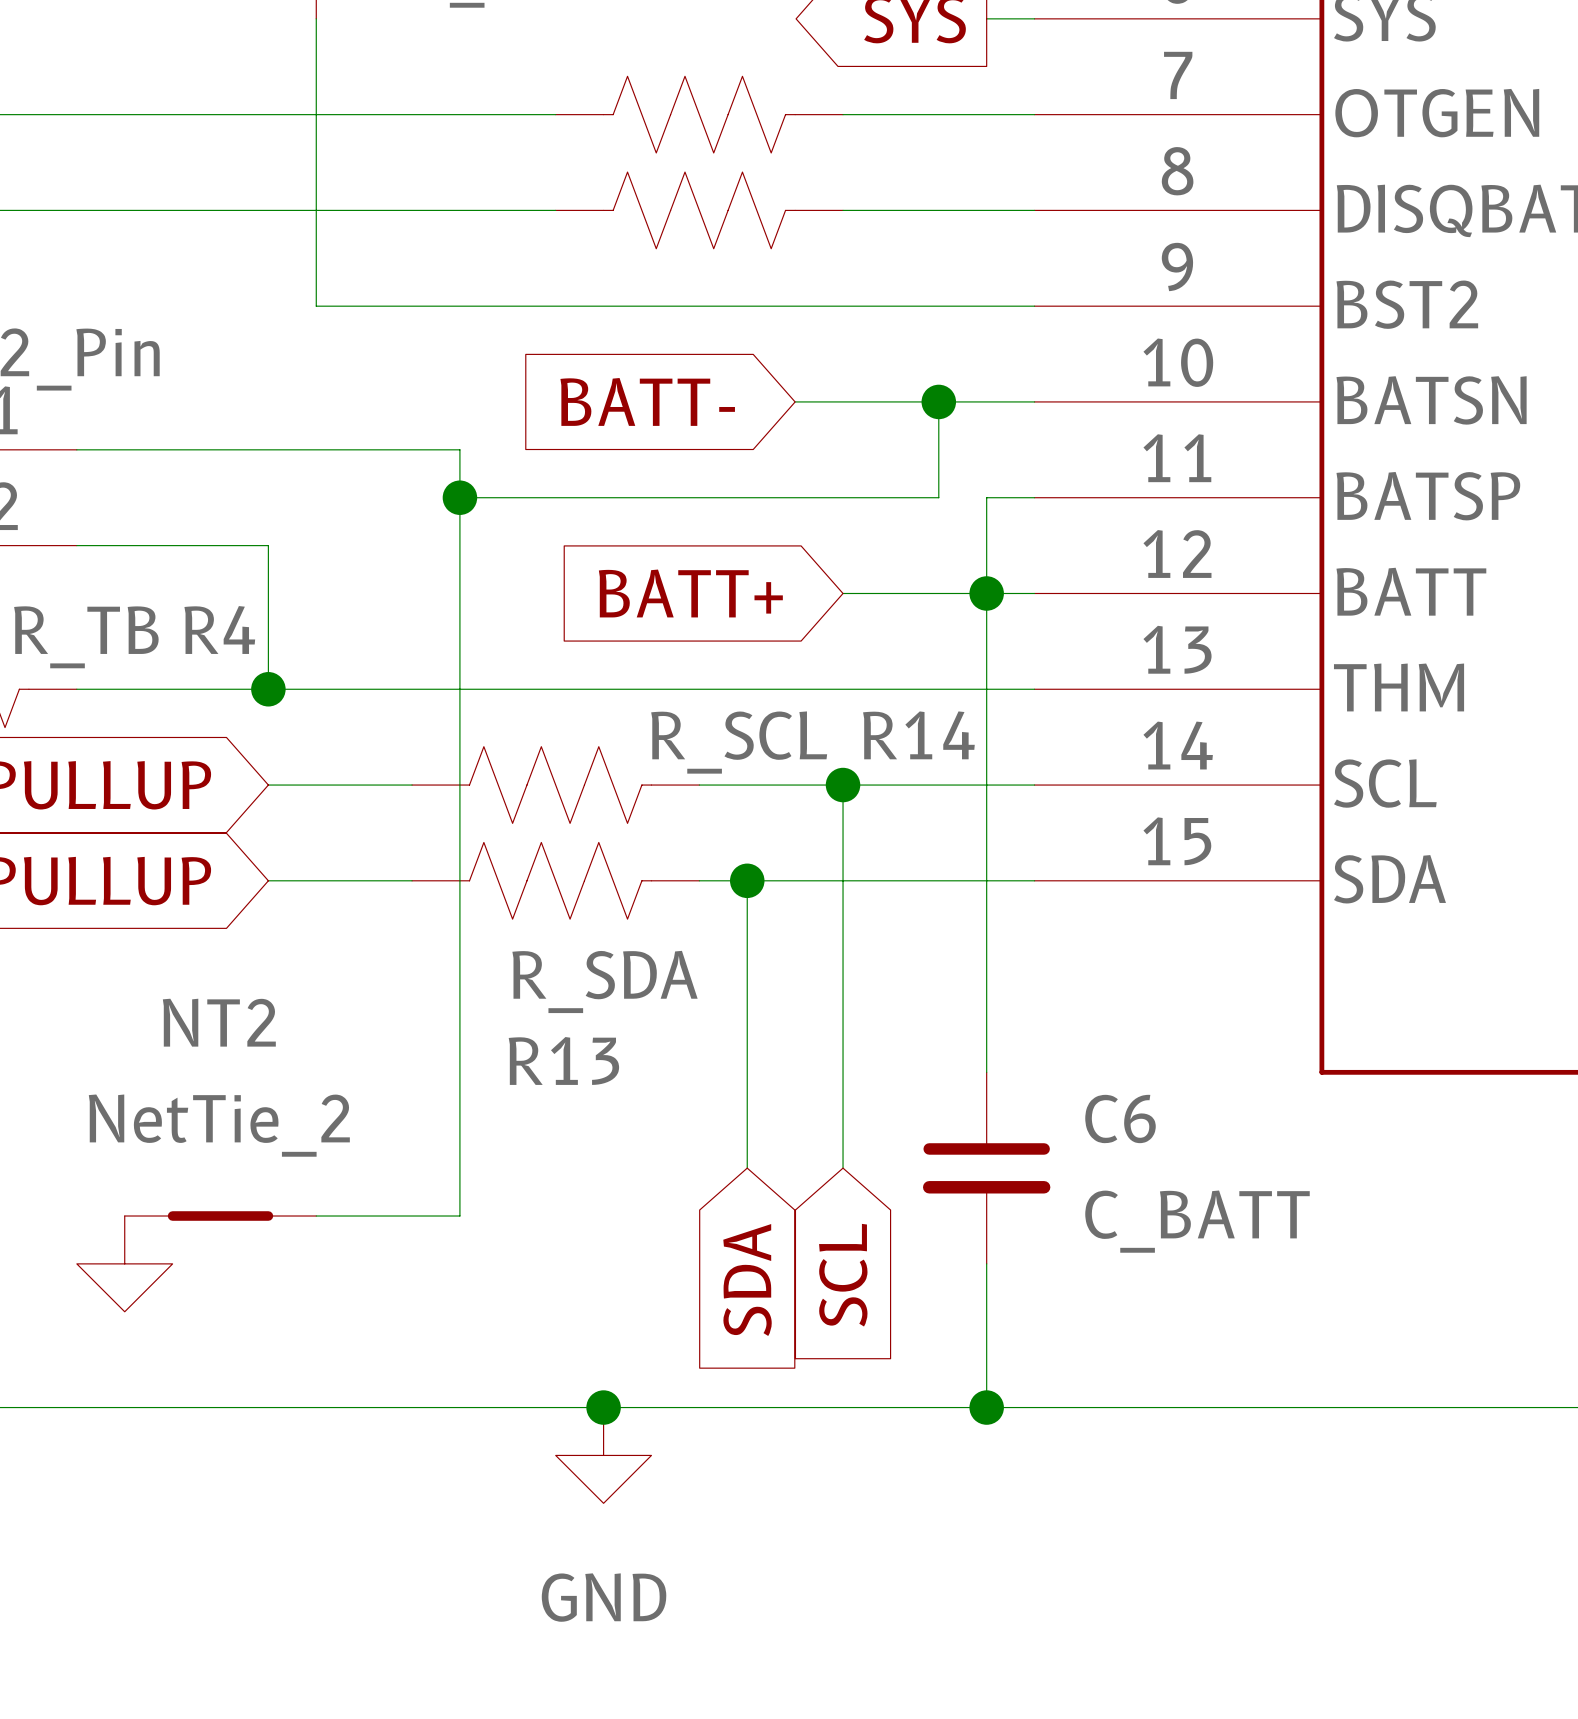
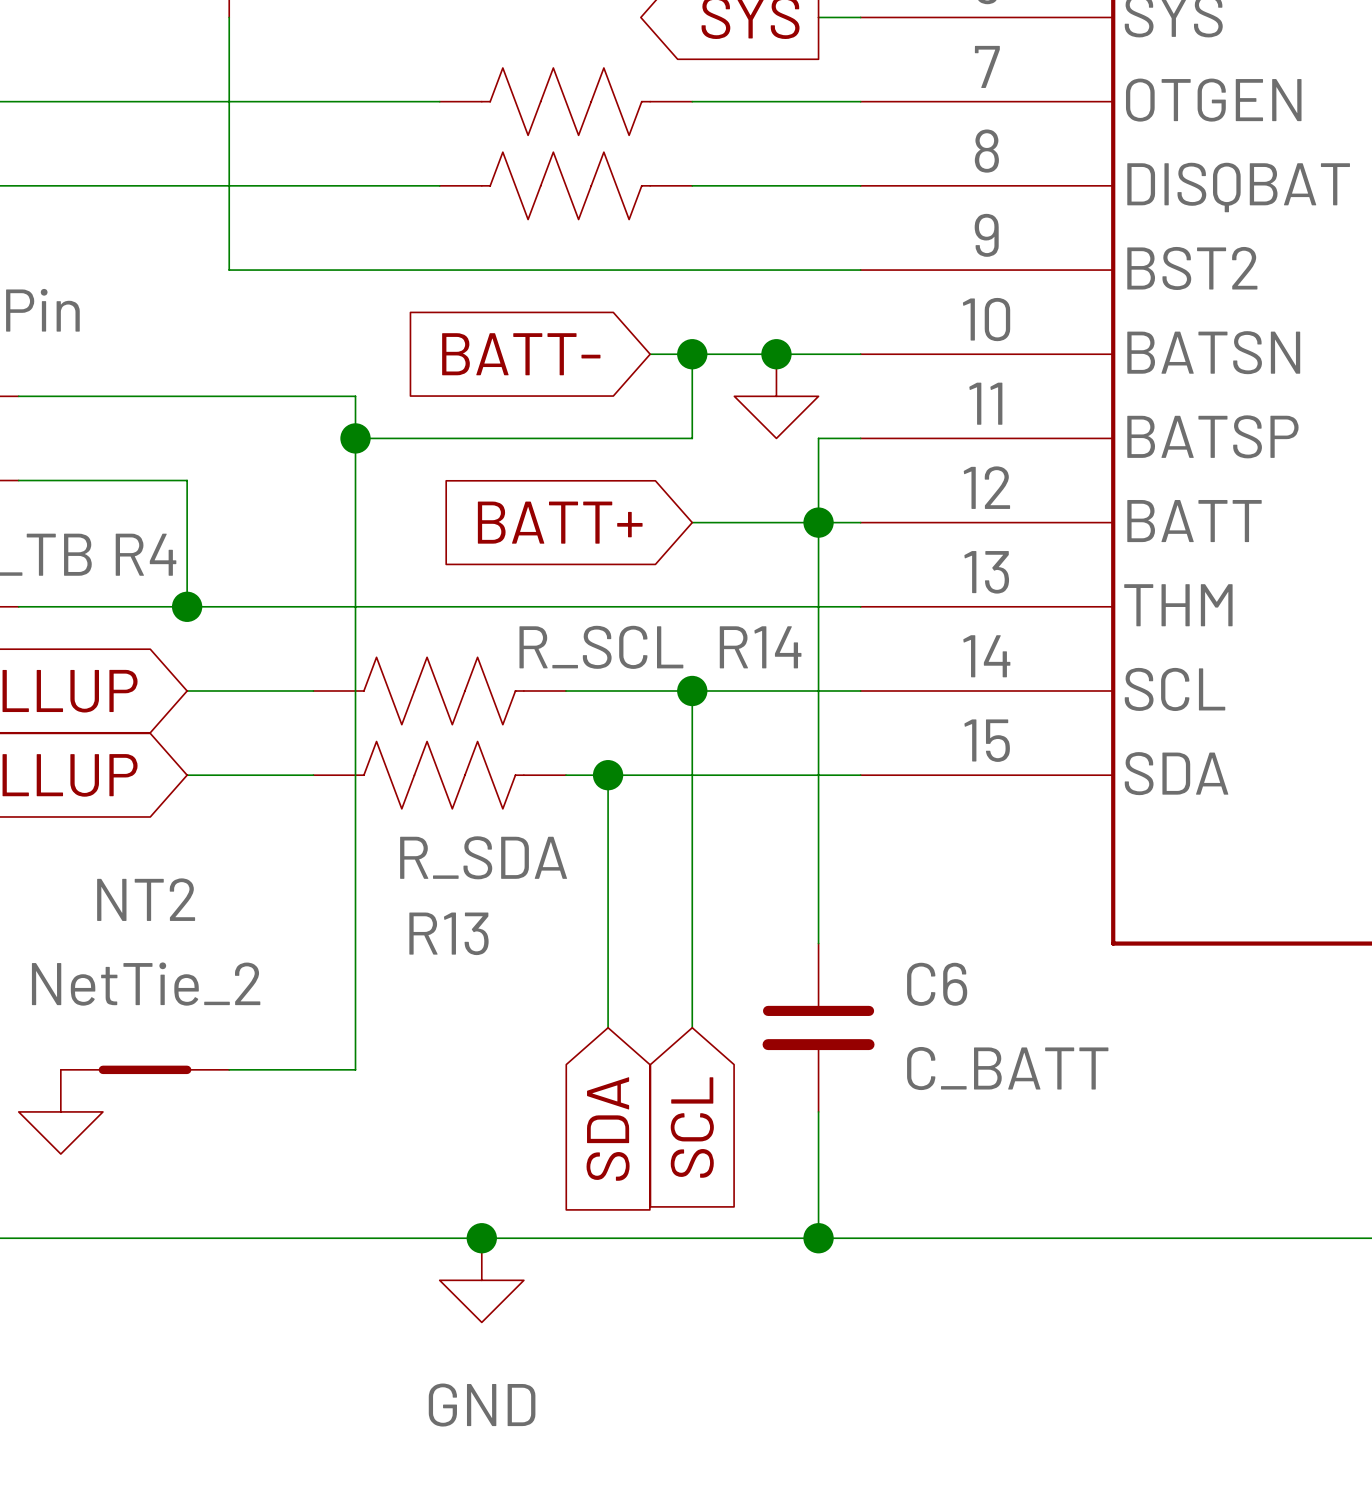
junction: none -> (692, 354)
wire: (938, 401) (938, 497) (843, 497) -> (692, 354) (692, 438)
power symbol: none -> (776, 396)

